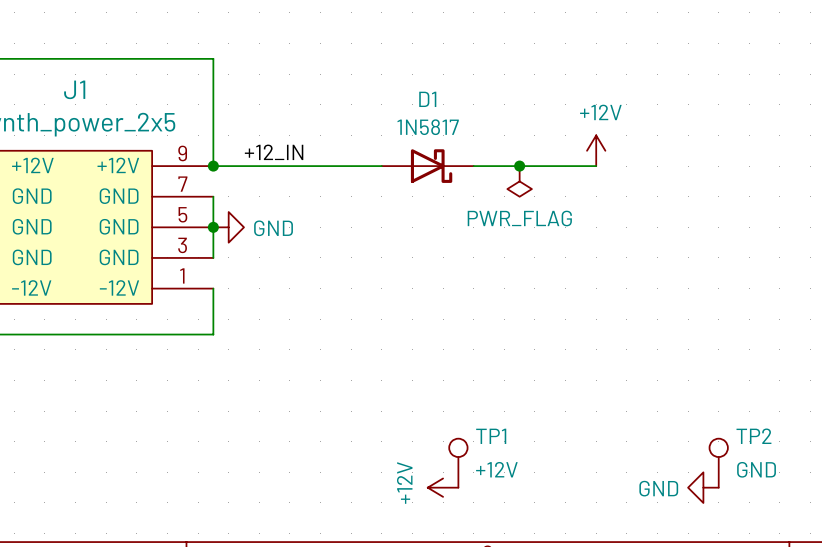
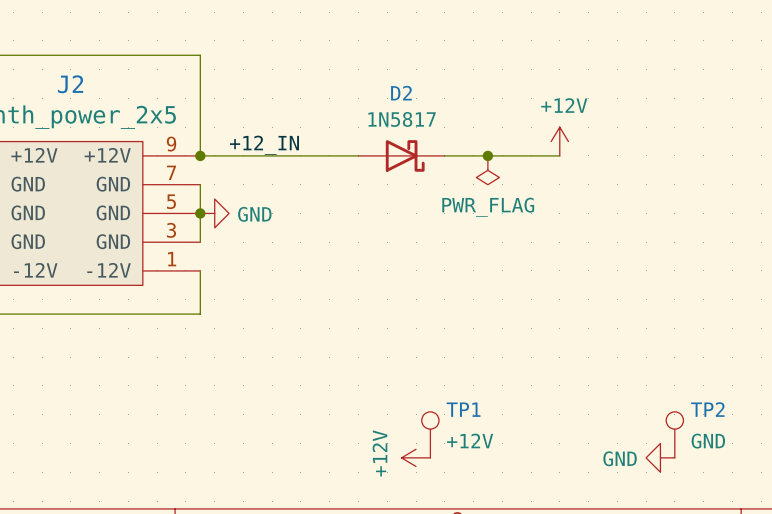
J1 name: J1 (74, 89) -> J2 (70, 84)
D1 name: D1 (427, 99) -> D2 (401, 93)

